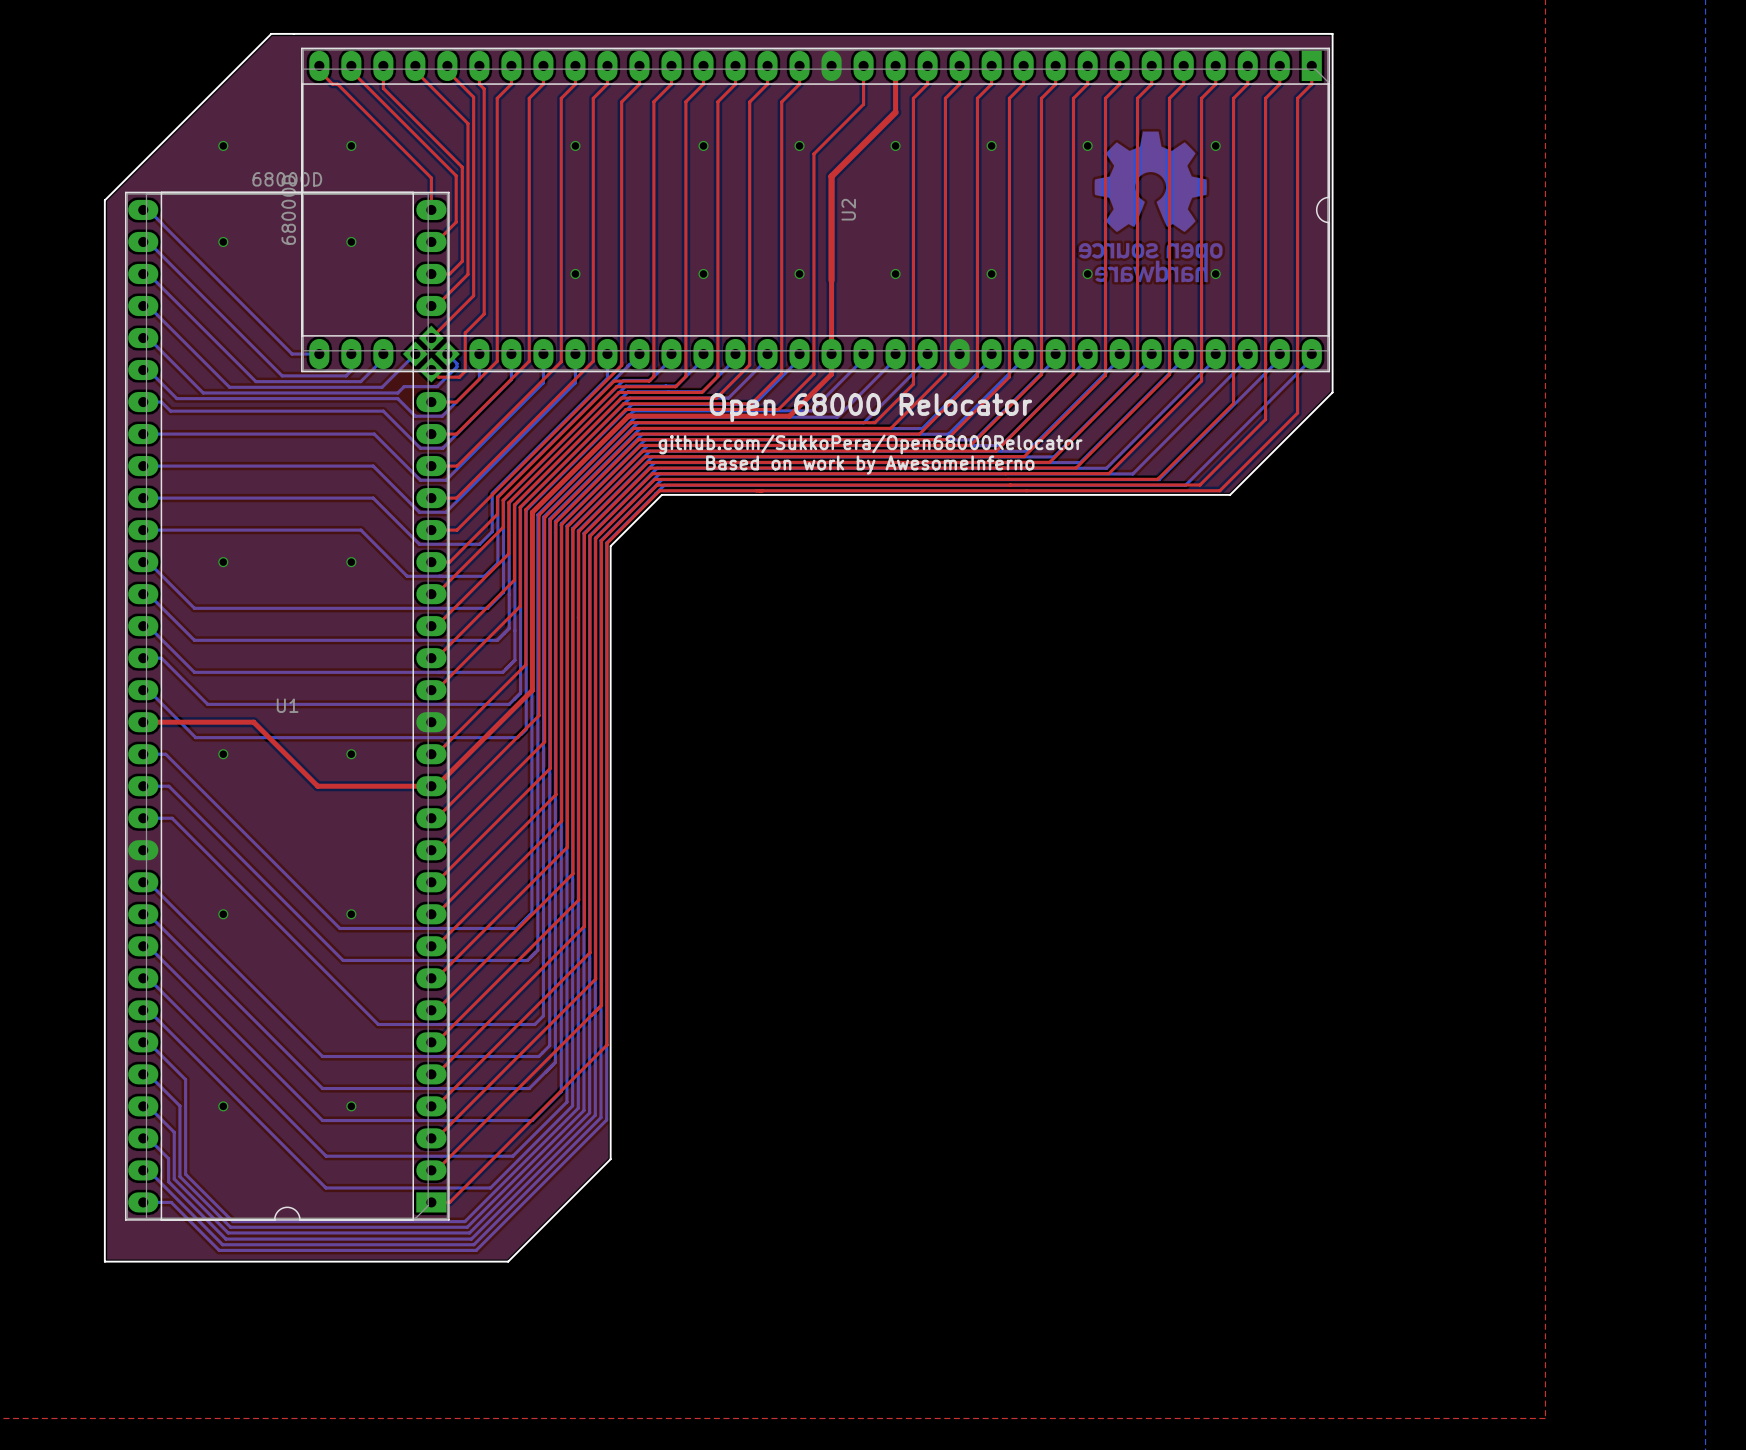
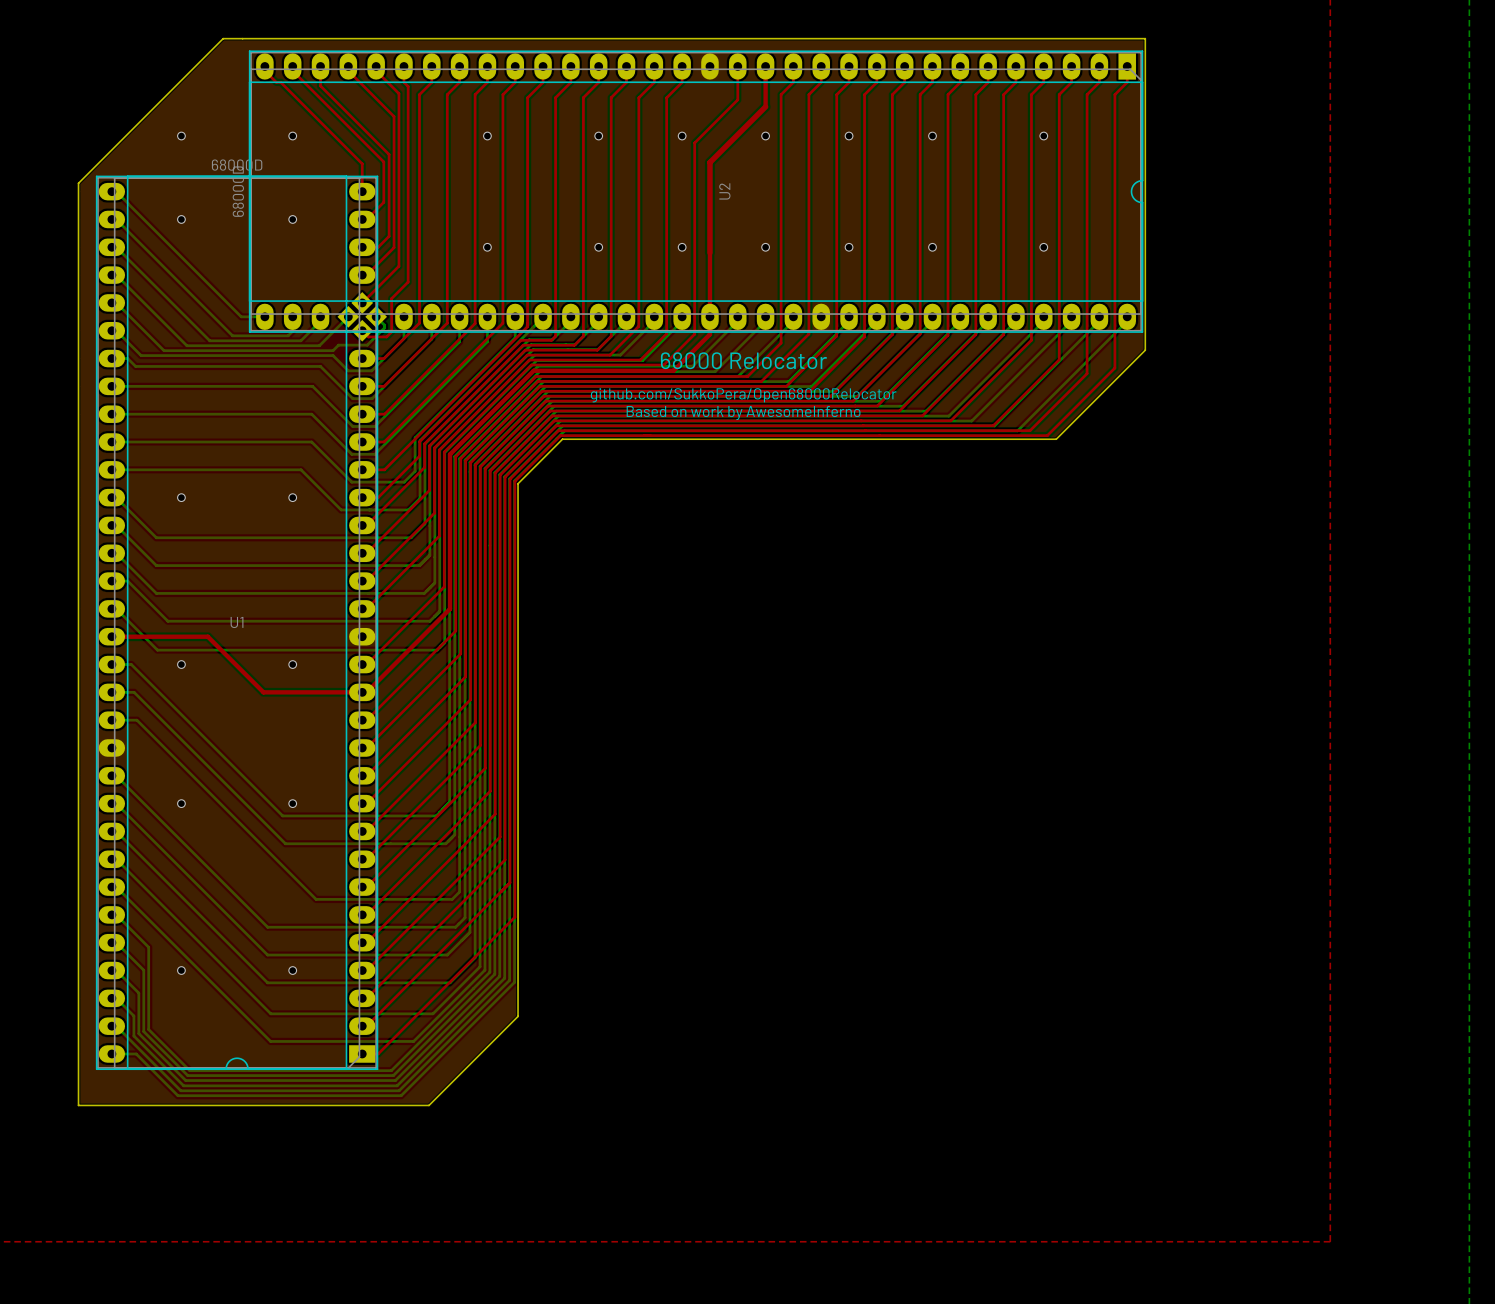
drawing: [1078, 131, 1223, 283] -> none
text: Open 68000 Relocator (870, 407) -> 68000 Relocator (743, 360)

